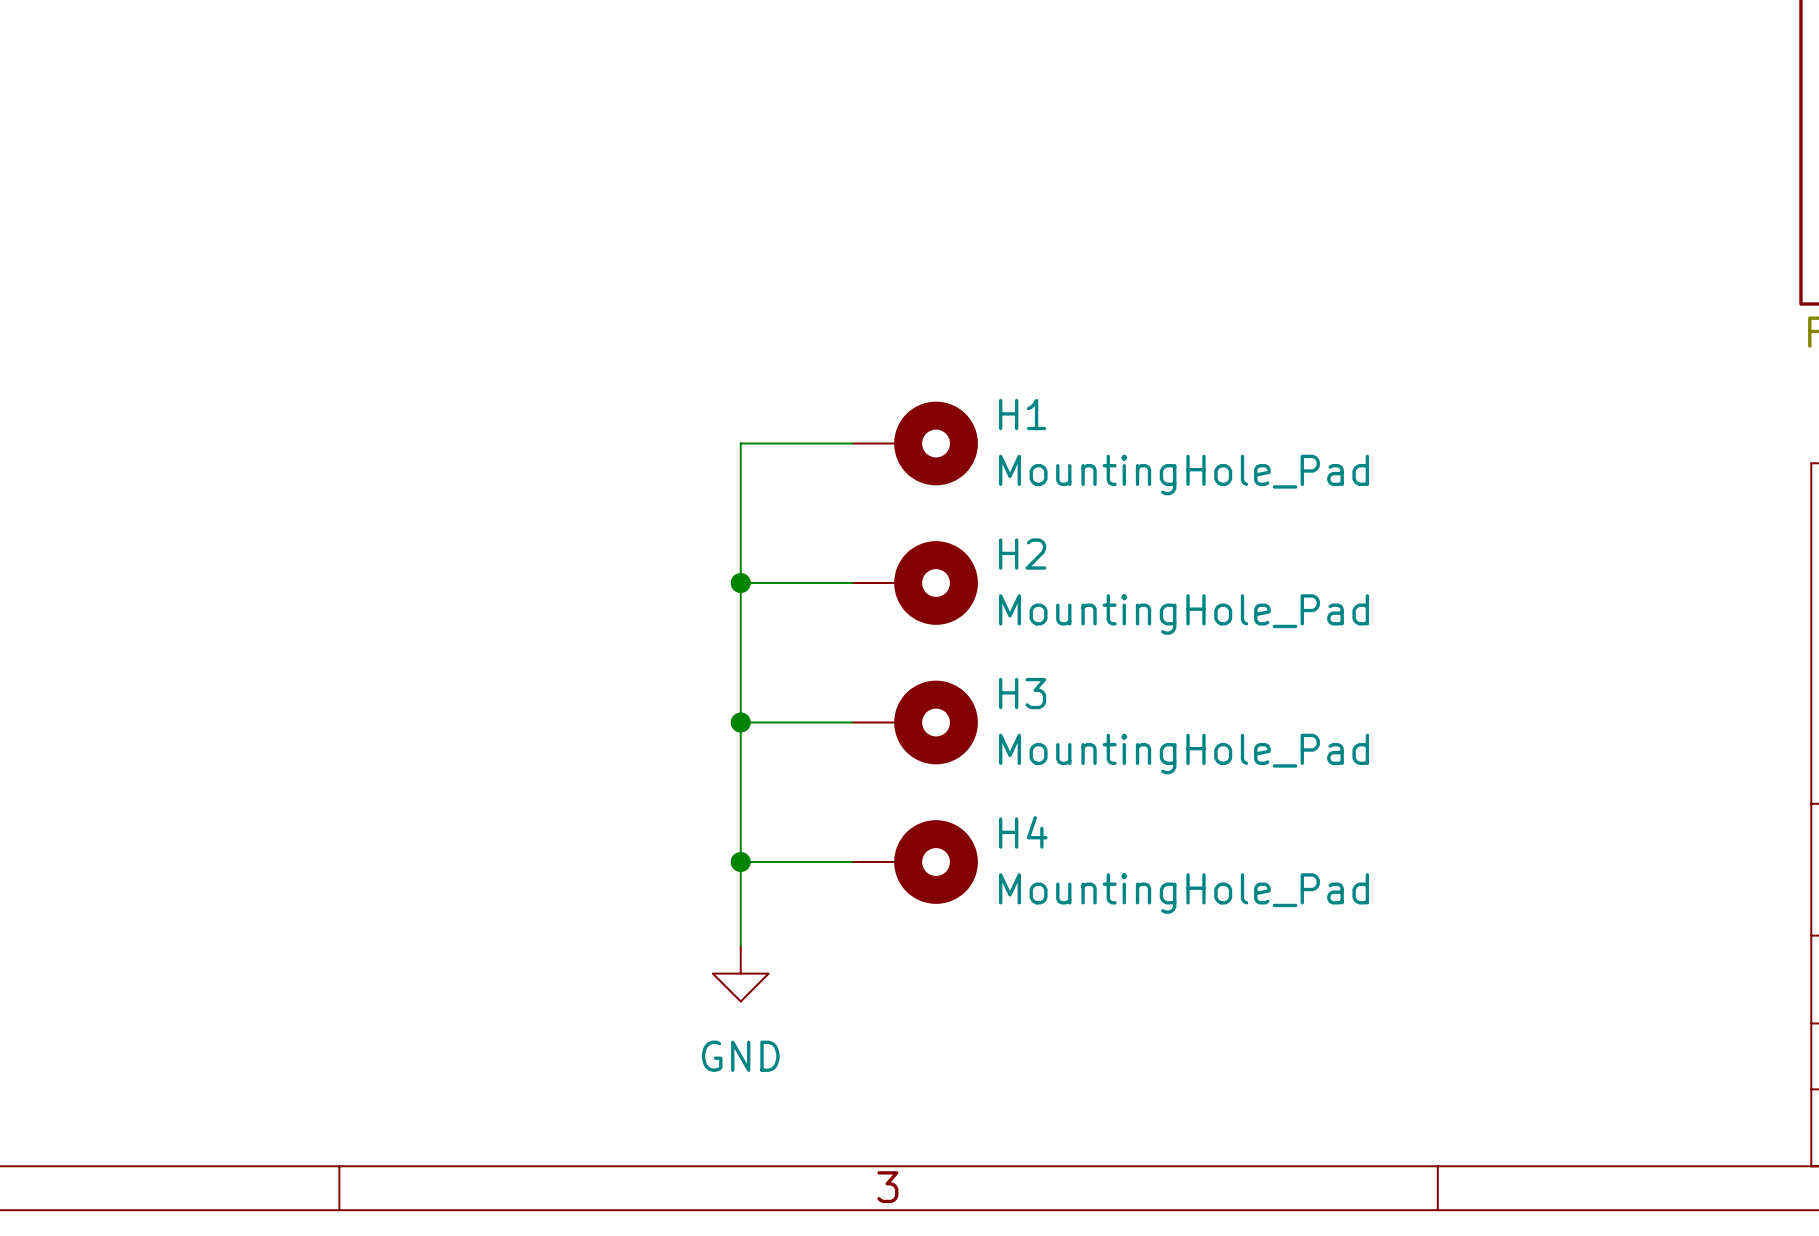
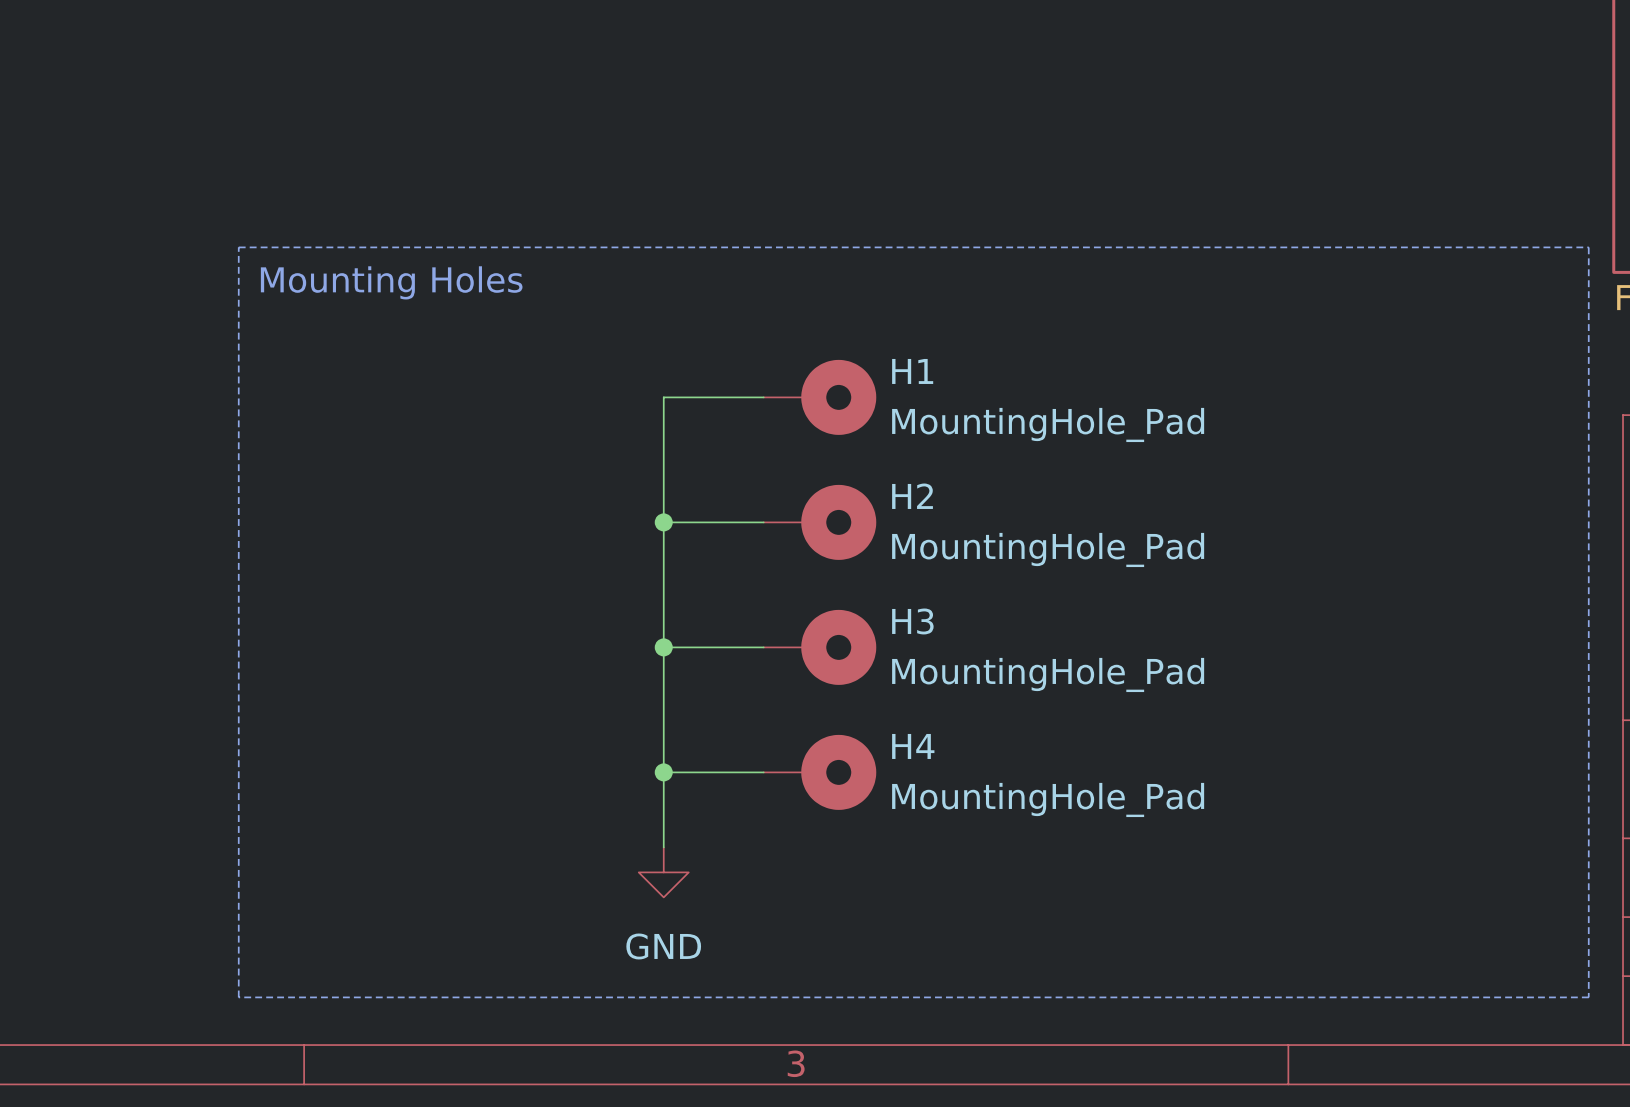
line: none -> (238, 247) (1588, 247) (1588, 997) (238, 997) (238, 247)
text: none -> Mounting Holes (391, 282)

